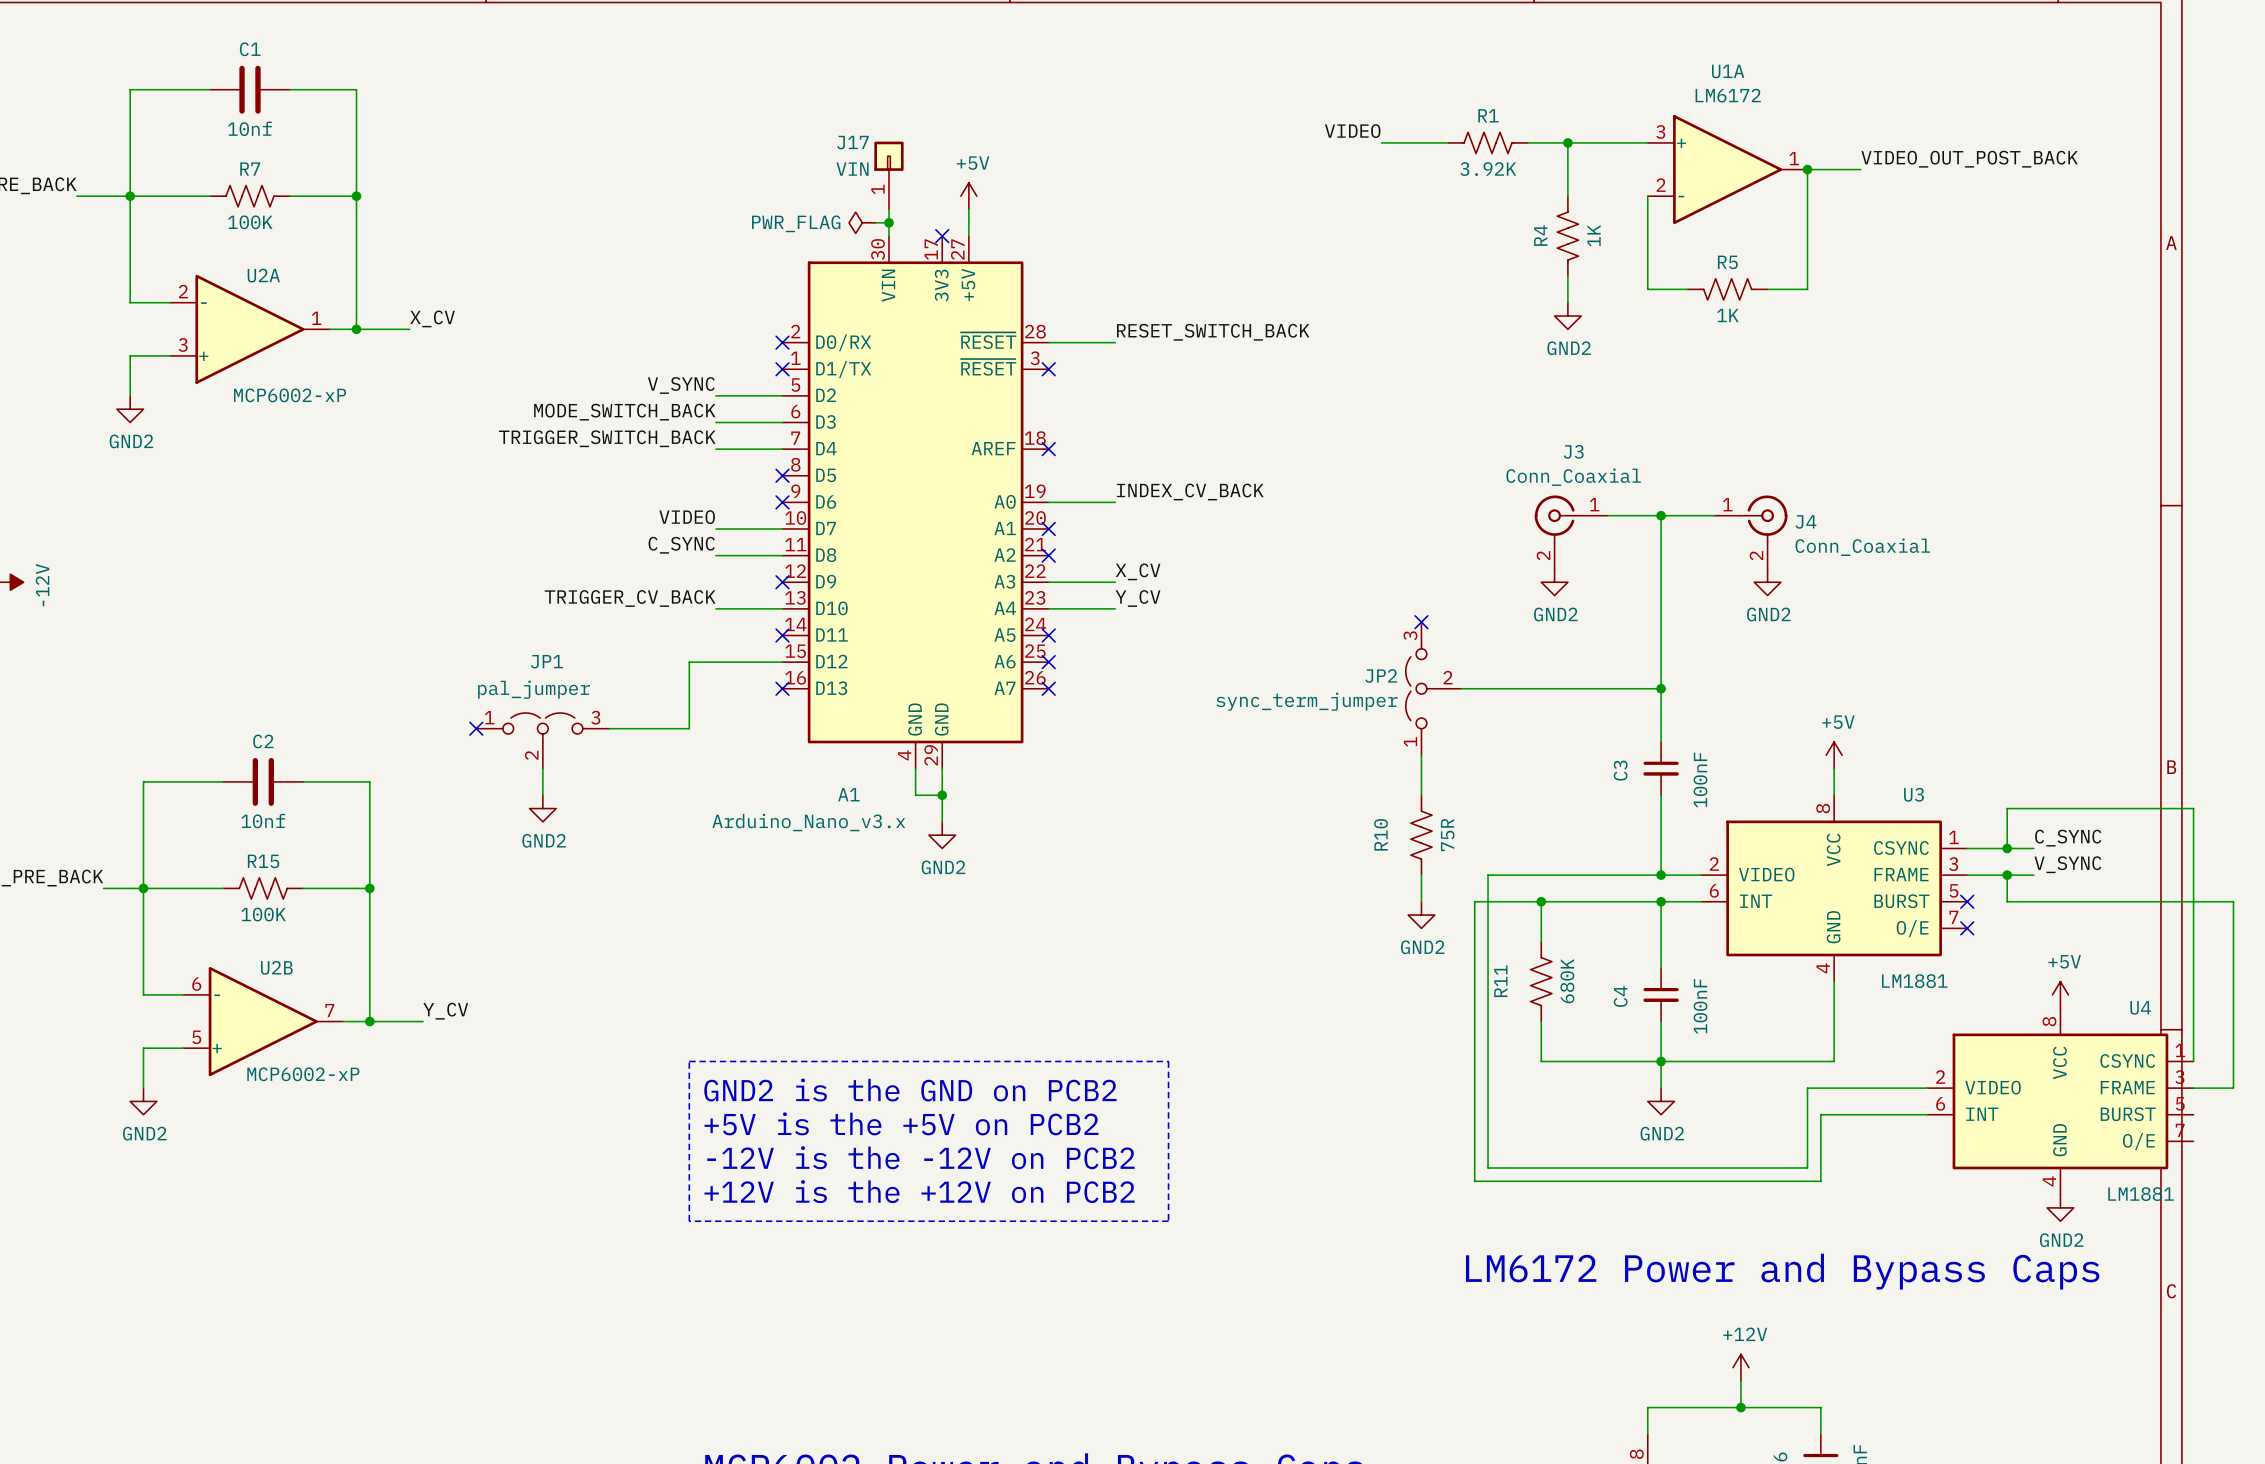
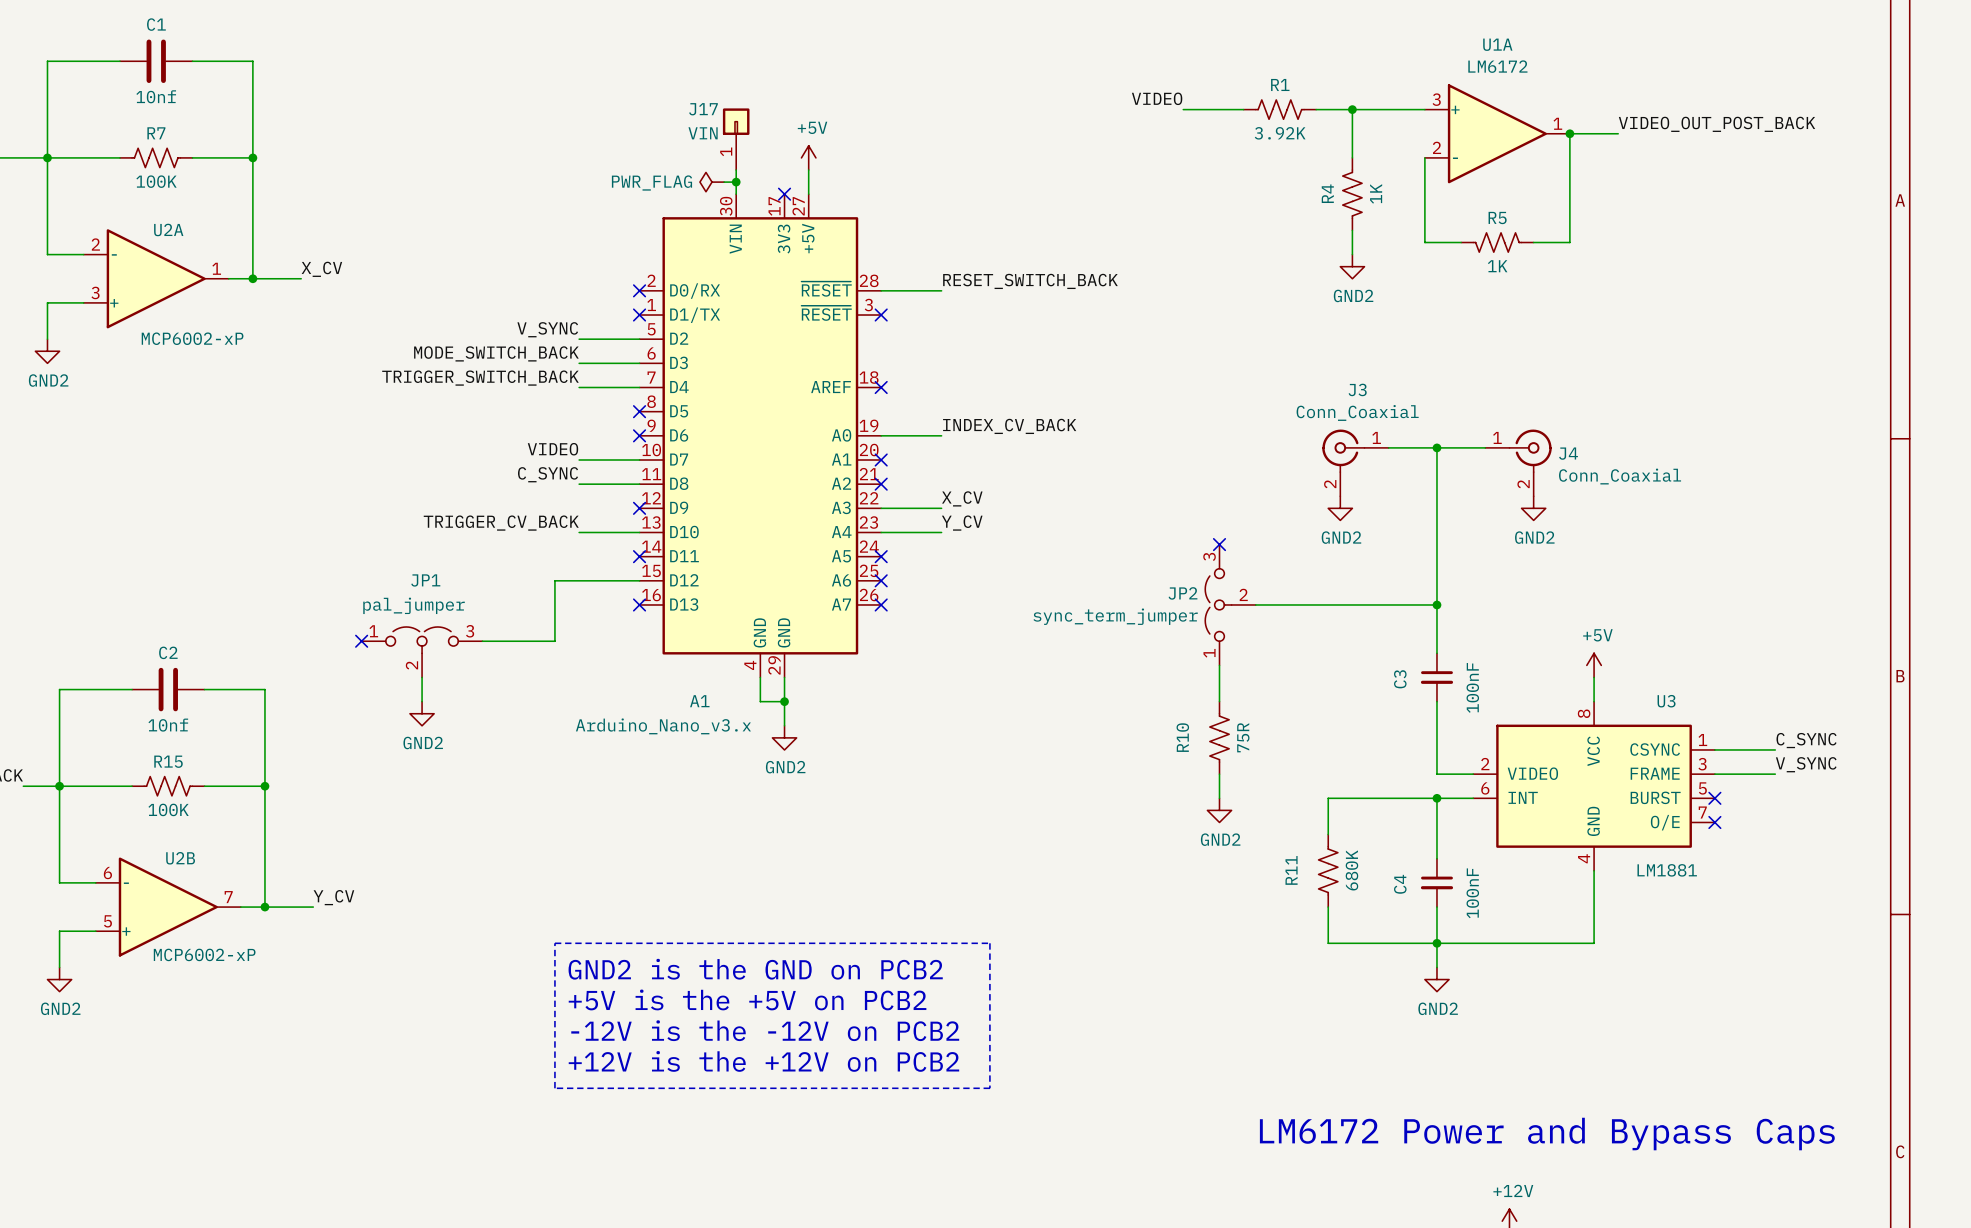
wire: (2007, 848) (2007, 808) (2193, 808) (2193, 1061) -> none
junction: (2007, 848) -> none
wire: (1661, 875) (1488, 875) (1488, 1167) (1807, 1167) (1807, 1088) (1927, 1088) -> none
junction: (1661, 875) -> none
wire: (2007, 875) (2007, 901) (2233, 901) (2233, 1088) (2193, 1088) -> none
junction: (2007, 875) -> none
wire: (1541, 901) (1474, 901) (1474, 1181) (1820, 1181) (1820, 1114) (1927, 1114) -> none
junction: (1541, 901) -> none
power symbol: +5V (2060, 994) -> none
U4: LM1881 (2060, 1101) -> none
power symbol: GND2 (2060, 1207) -> none

